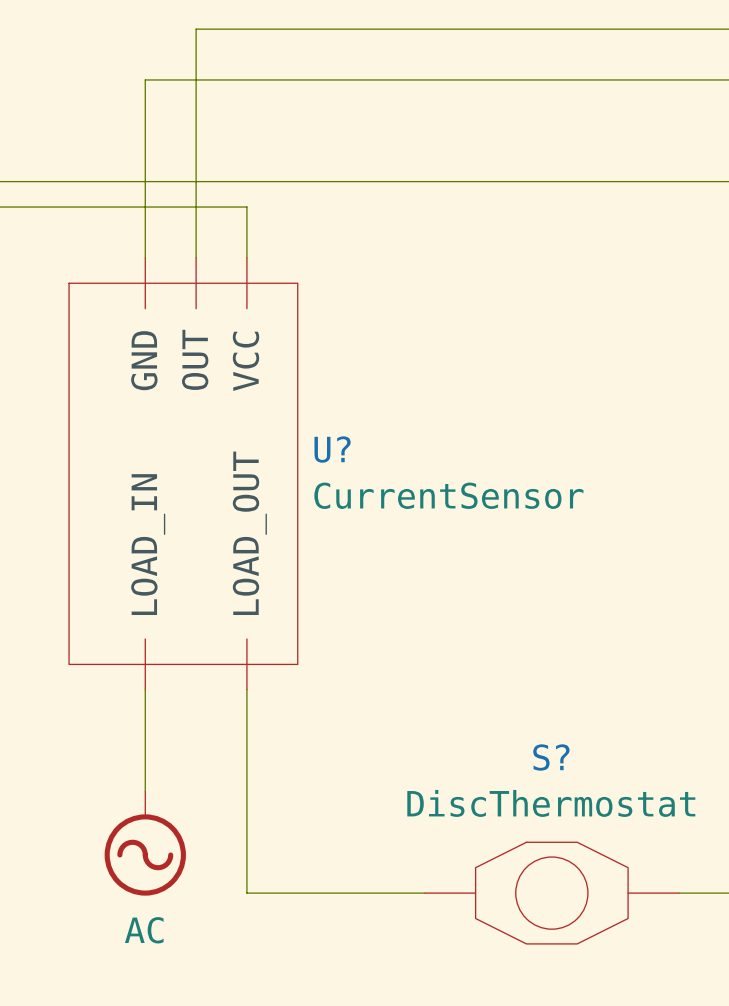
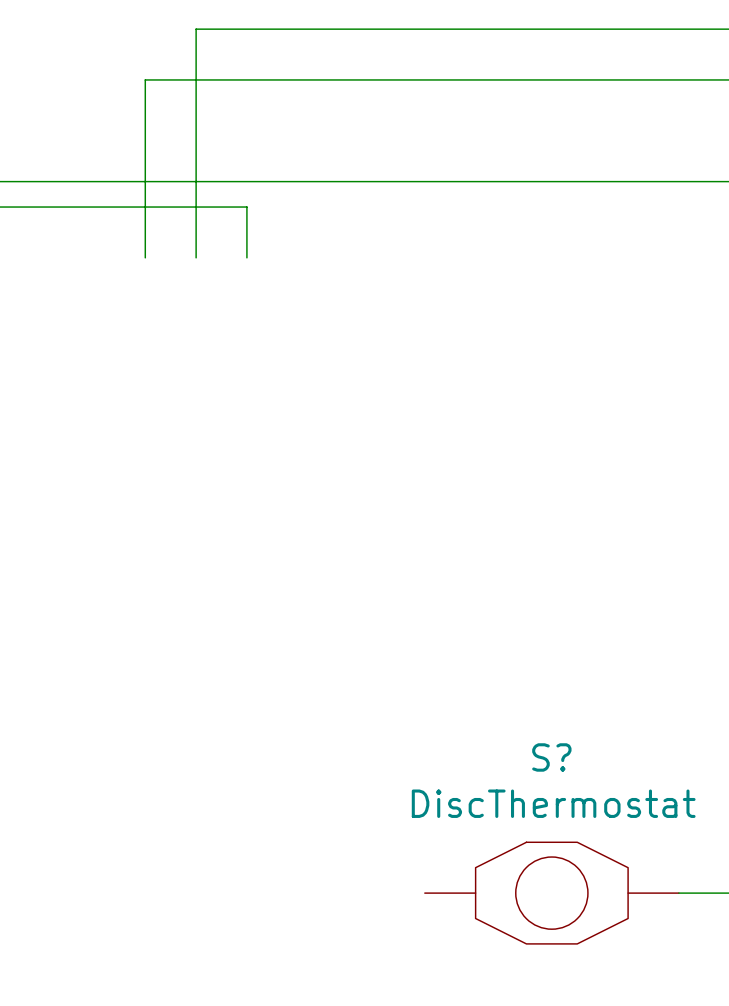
U?: CurrentSensor (183, 473) -> none
wire: (145, 689) (145, 791) -> none
wire: (246, 689) (246, 893) (424, 893) -> none
power symbol: AC (145, 843) -> none

